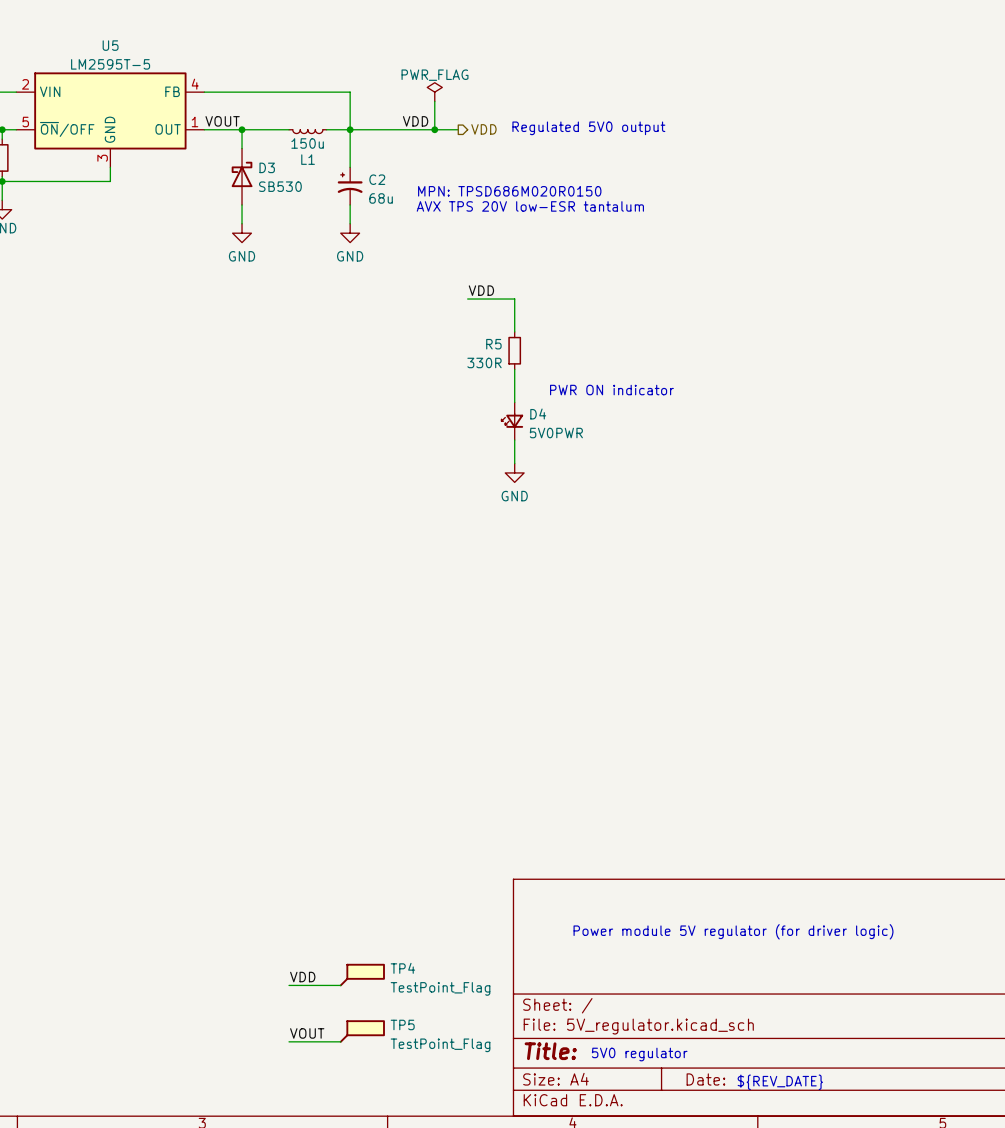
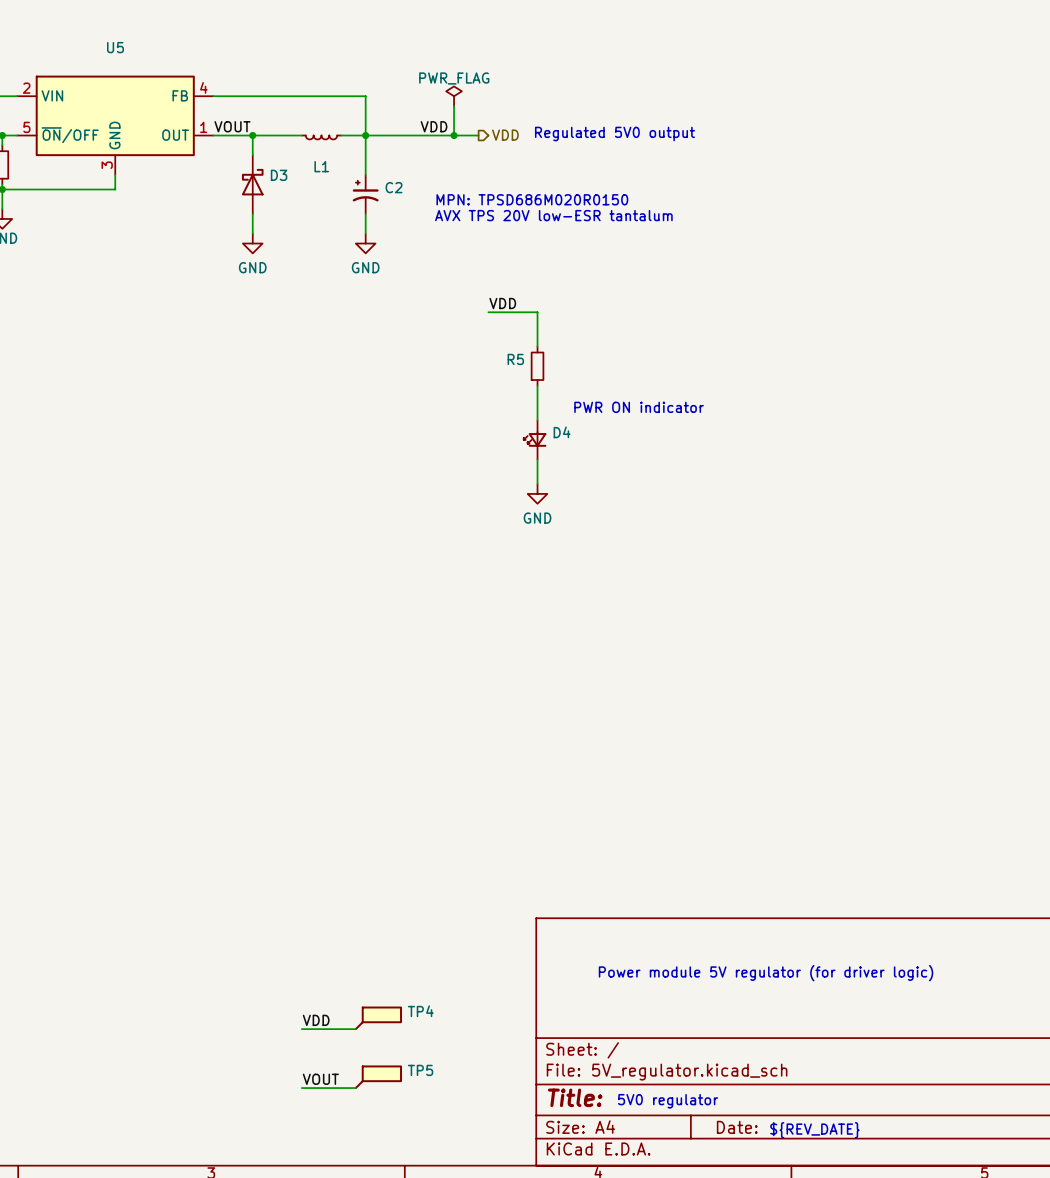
U5 value: LM2595T-5 (110, 64) -> none
L1 value: 150u (307, 143) -> none
D3 value: SB530 (280, 186) -> none
C2 value: 68u (381, 198) -> none
R5 value: 330R (484, 362) -> none
D4 value: 5V0PWR (556, 433) -> none
TP4 value: TestPoint_Flag (440, 988) -> none
TP5 value: TestPoint_Flag (440, 1045) -> none

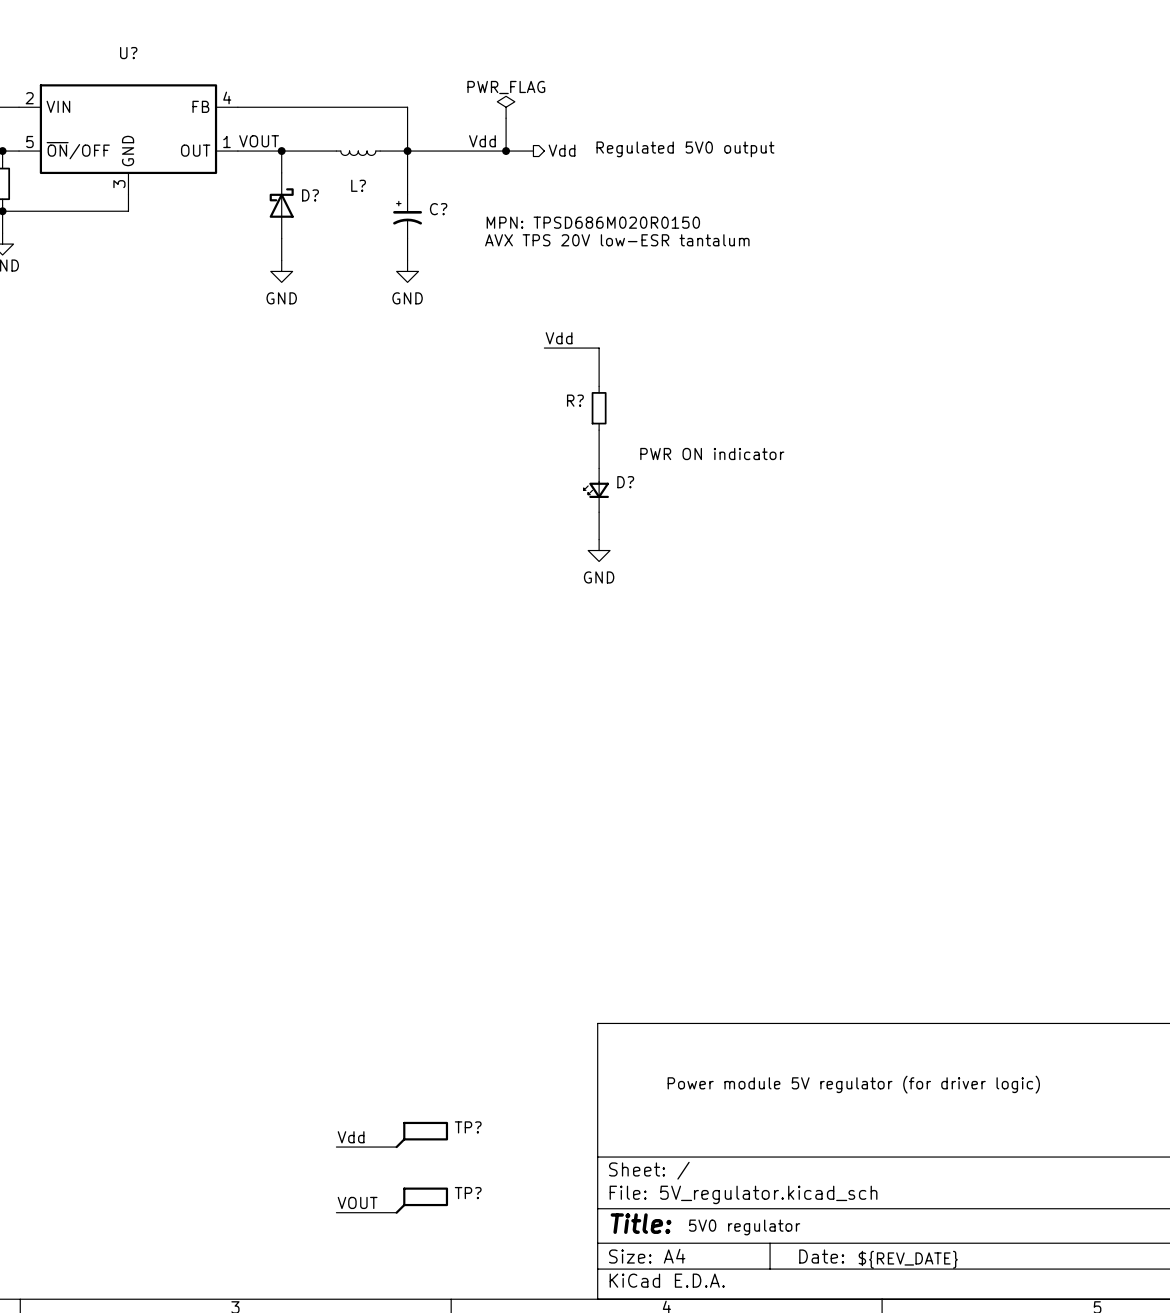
U5 name: U5 (115, 47) -> U? (128, 53)
label: VDD (434, 126) -> Vdd (482, 141)
hierarchical label: VDD (505, 135) -> Vdd (562, 150)
L1 name: L1 (321, 166) -> L? (358, 185)
D3 name: D3 (279, 175) -> D? (310, 195)
C2 name: C2 (394, 187) -> C? (438, 209)
label: VDD (502, 303) -> Vdd (559, 338)
R5 name: R5 (515, 359) -> R? (575, 400)
D4 name: D4 (562, 432) -> D? (625, 482)
TP4 name: TP4 (420, 1011) -> TP? (468, 1127)
label: VDD (316, 1020) -> Vdd (351, 1137)
TP5 name: TP5 (420, 1070) -> TP? (468, 1193)

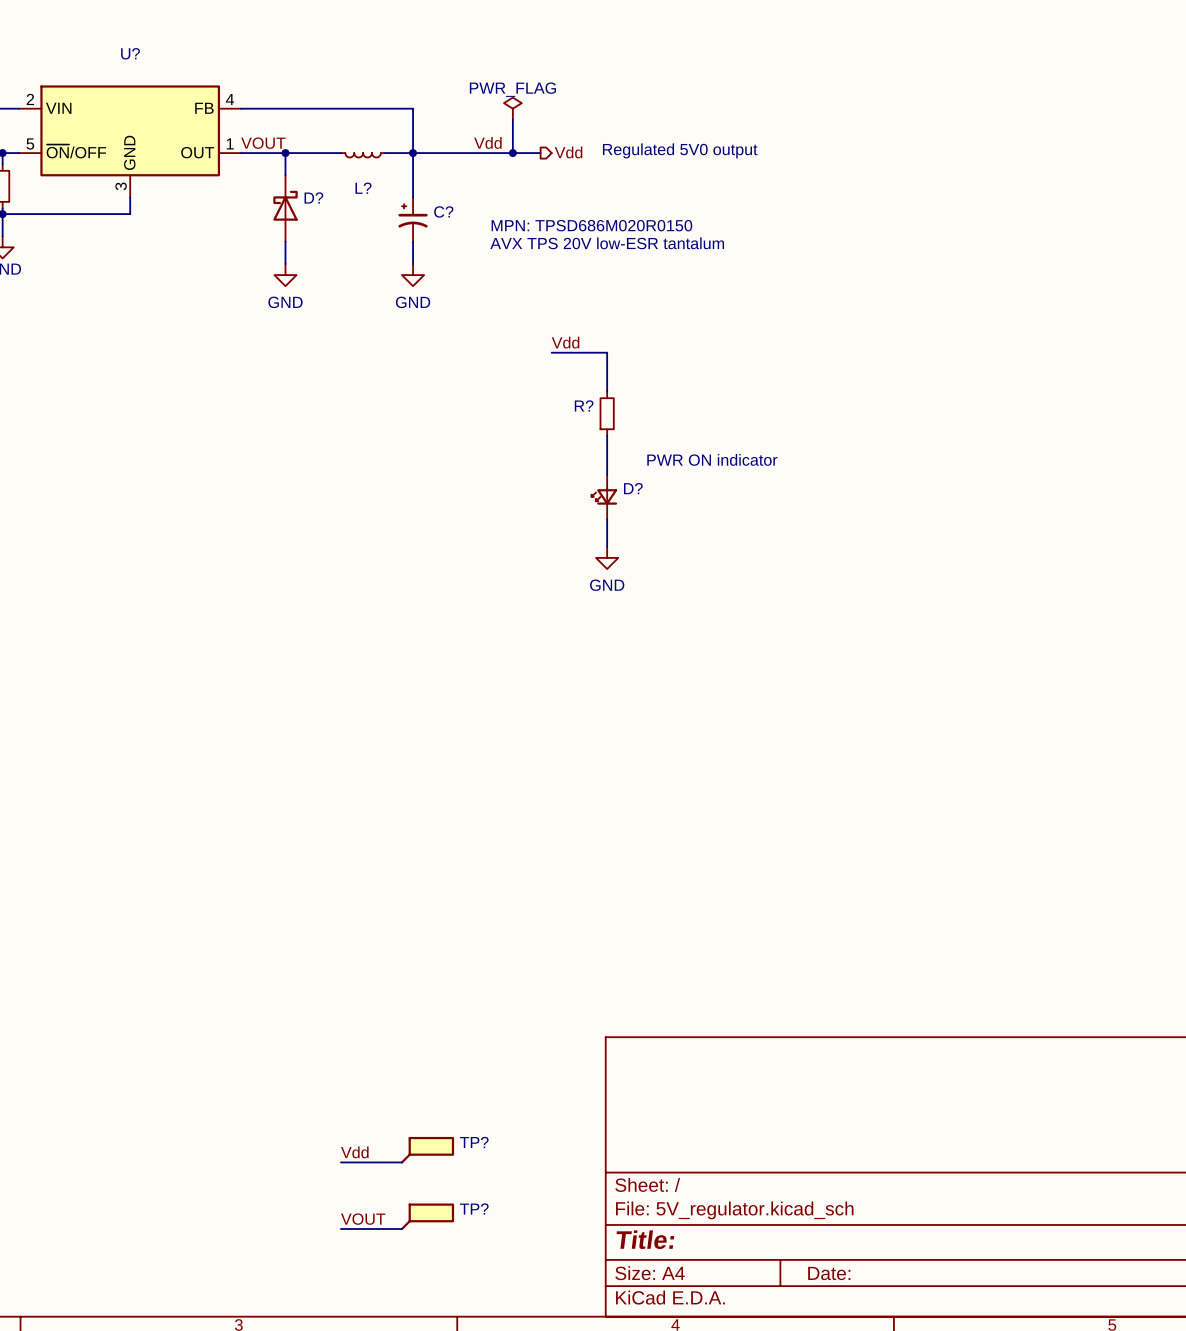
text: Power module 5V regulator (for driver logic) (853, 1084) -> none
text: 5V0 regulator (744, 1227) -> none
text: ${REV_DATE} (908, 1259) -> none

